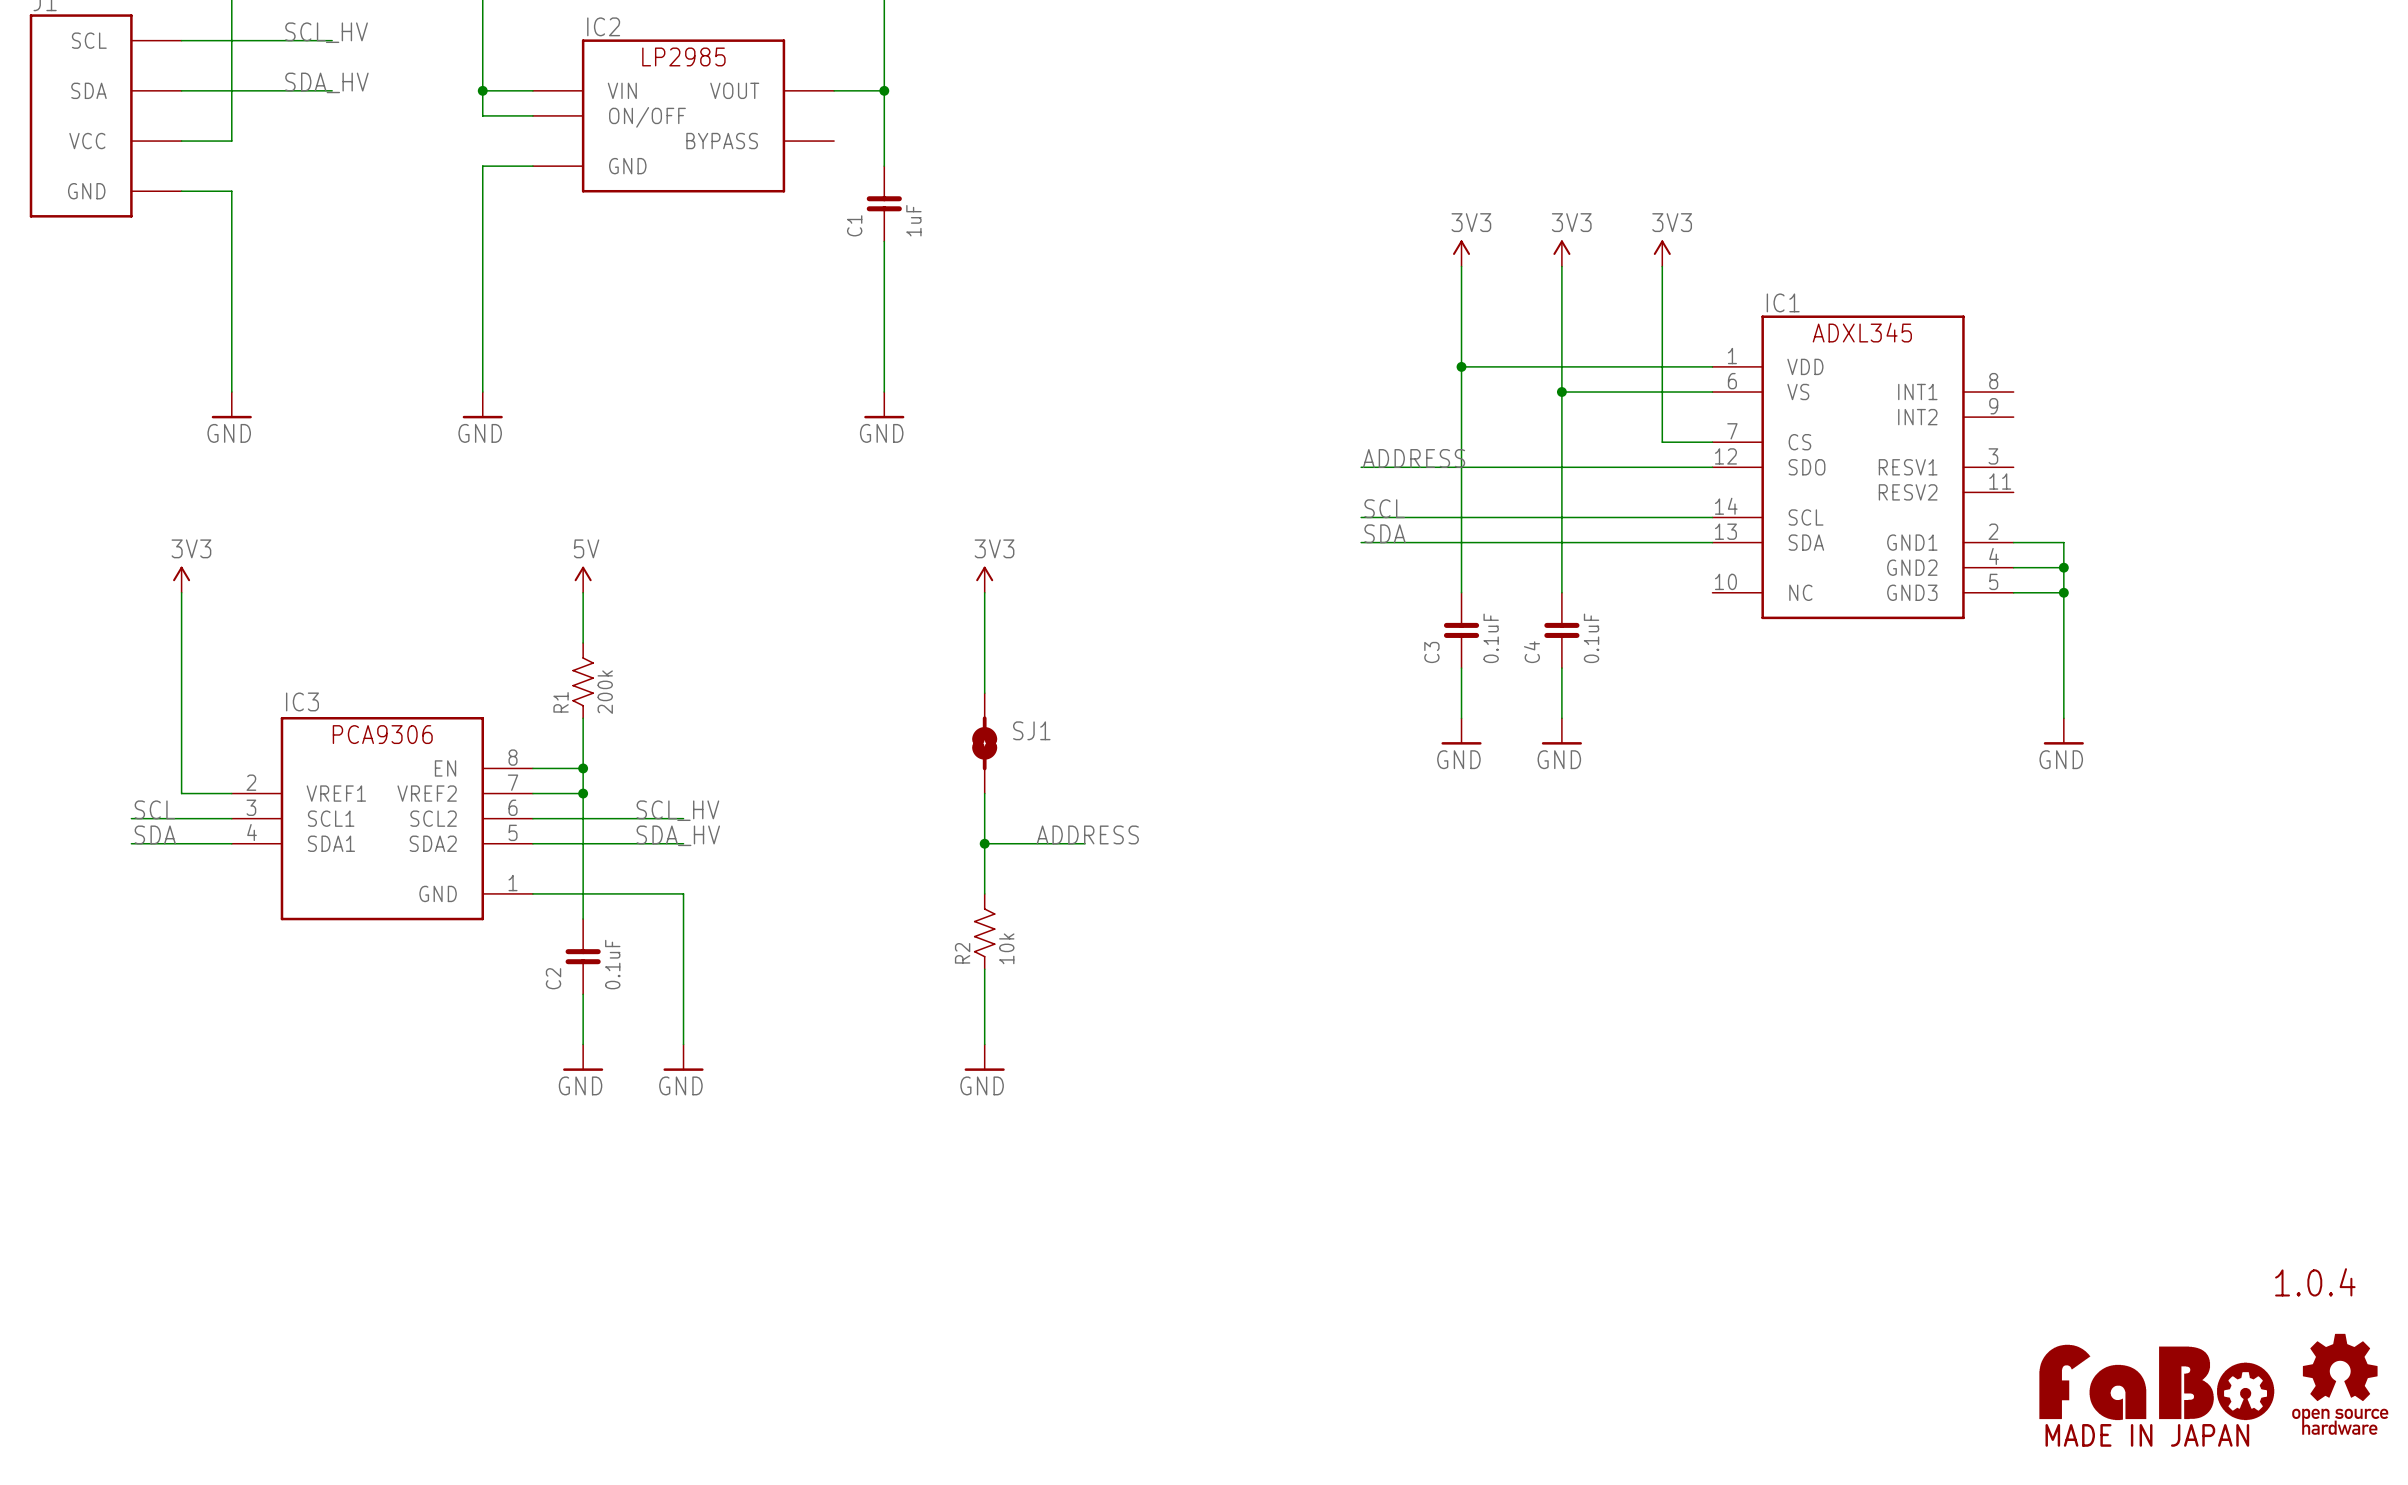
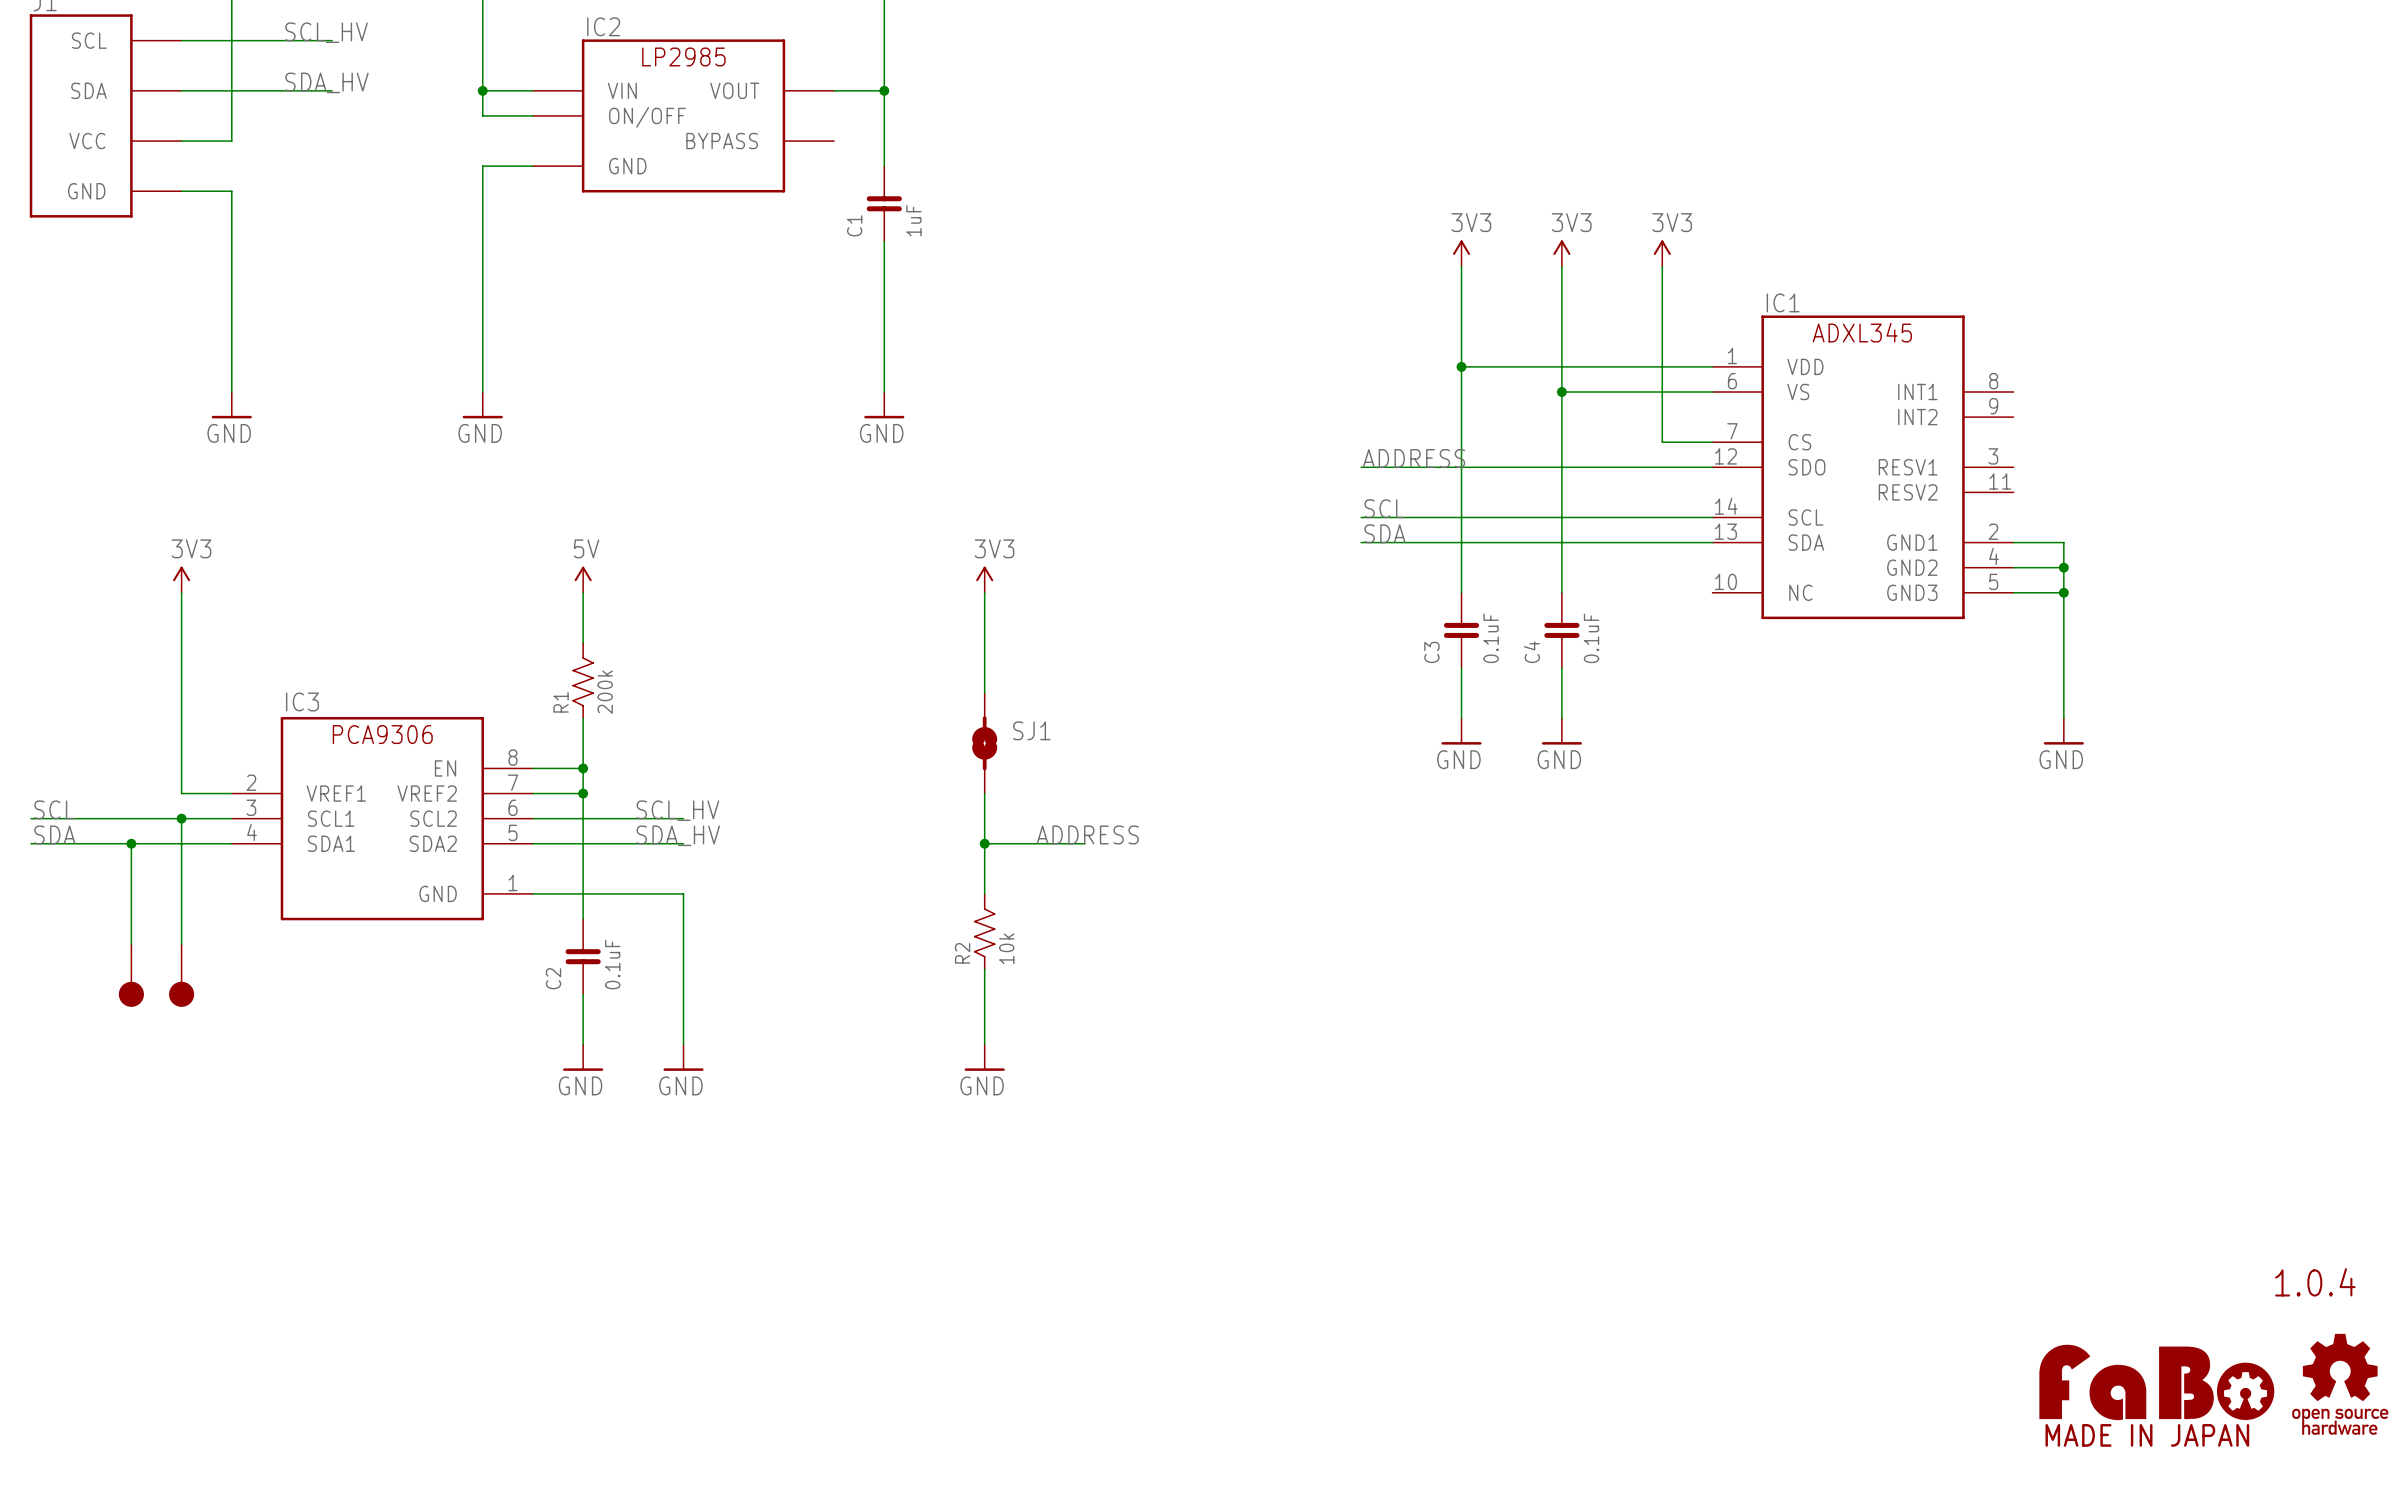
label position: SCL (154, 809) -> SCL (54, 809)
wire: none -> (31, 818) (131, 818)
wire: none -> (181, 818) (181, 944)
junction: none -> (181, 818)
label position: SDA (155, 834) -> SDA (54, 834)
wire: none -> (31, 843) (131, 843) (131, 944)
junction: none -> (131, 843)
part: none -> (131, 975)
part: none -> (181, 975)

